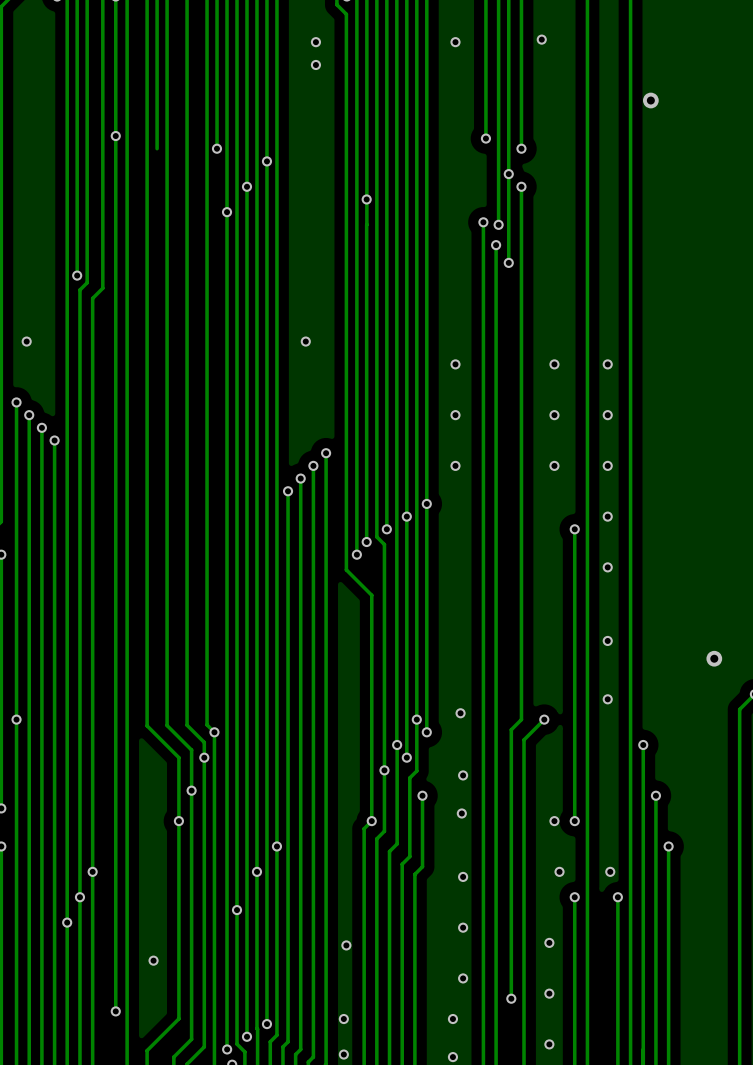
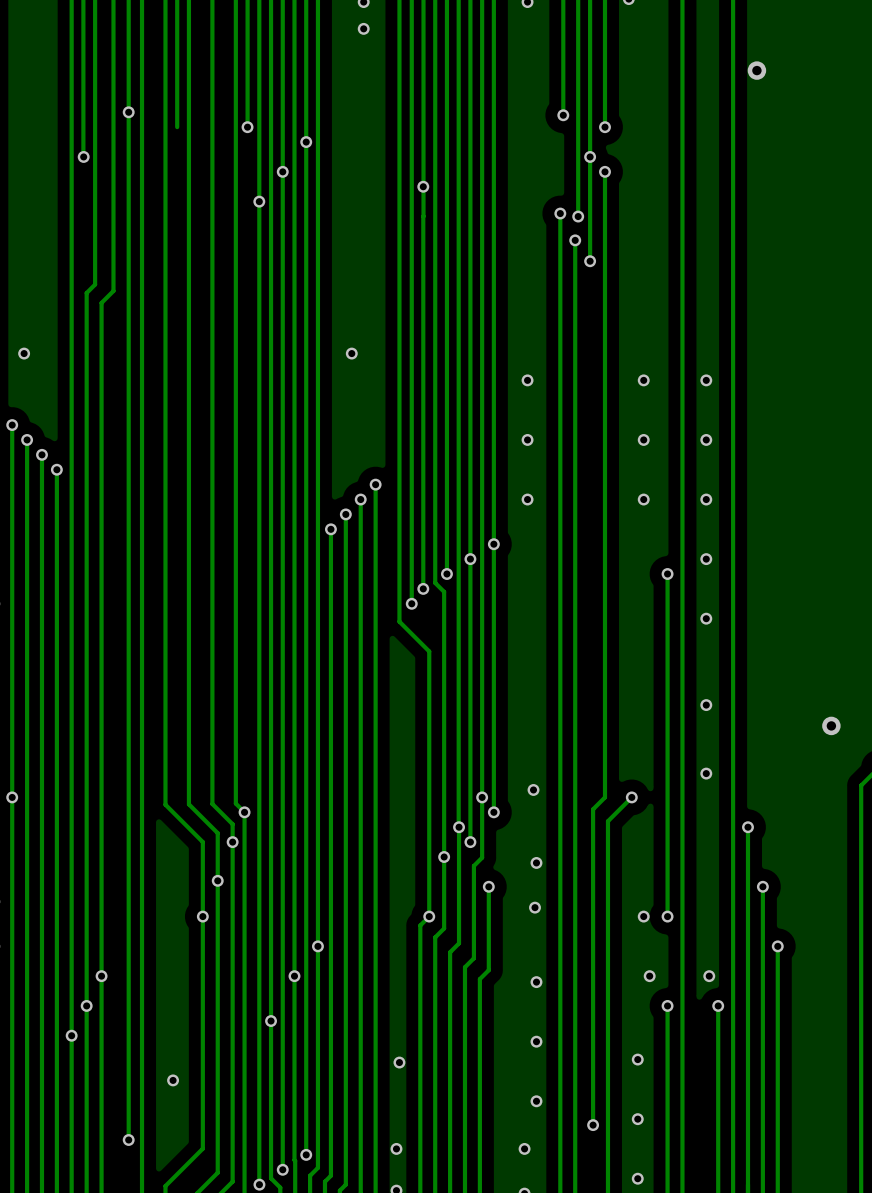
track: (77, 173) (77, 275) -> none
via position: (77, 275) -> (83, 156)

